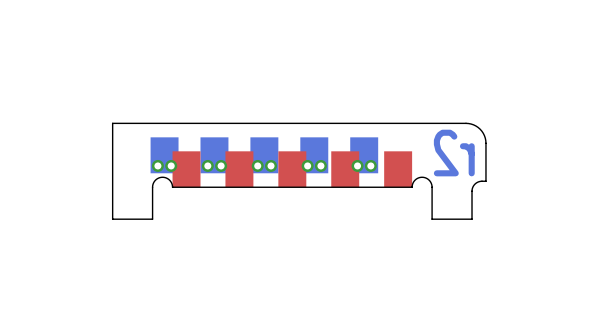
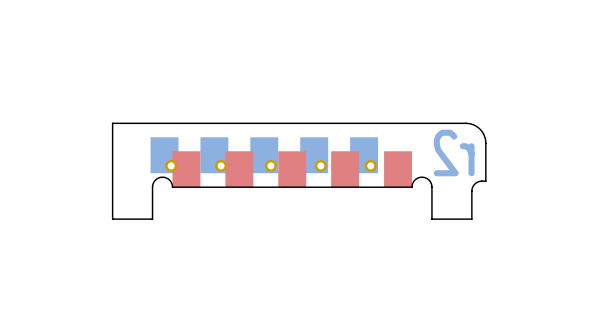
part: (157, 165) -> none
part: (207, 165) -> none
part: (257, 165) -> none
part: (307, 165) -> none
part: (357, 165) -> none

